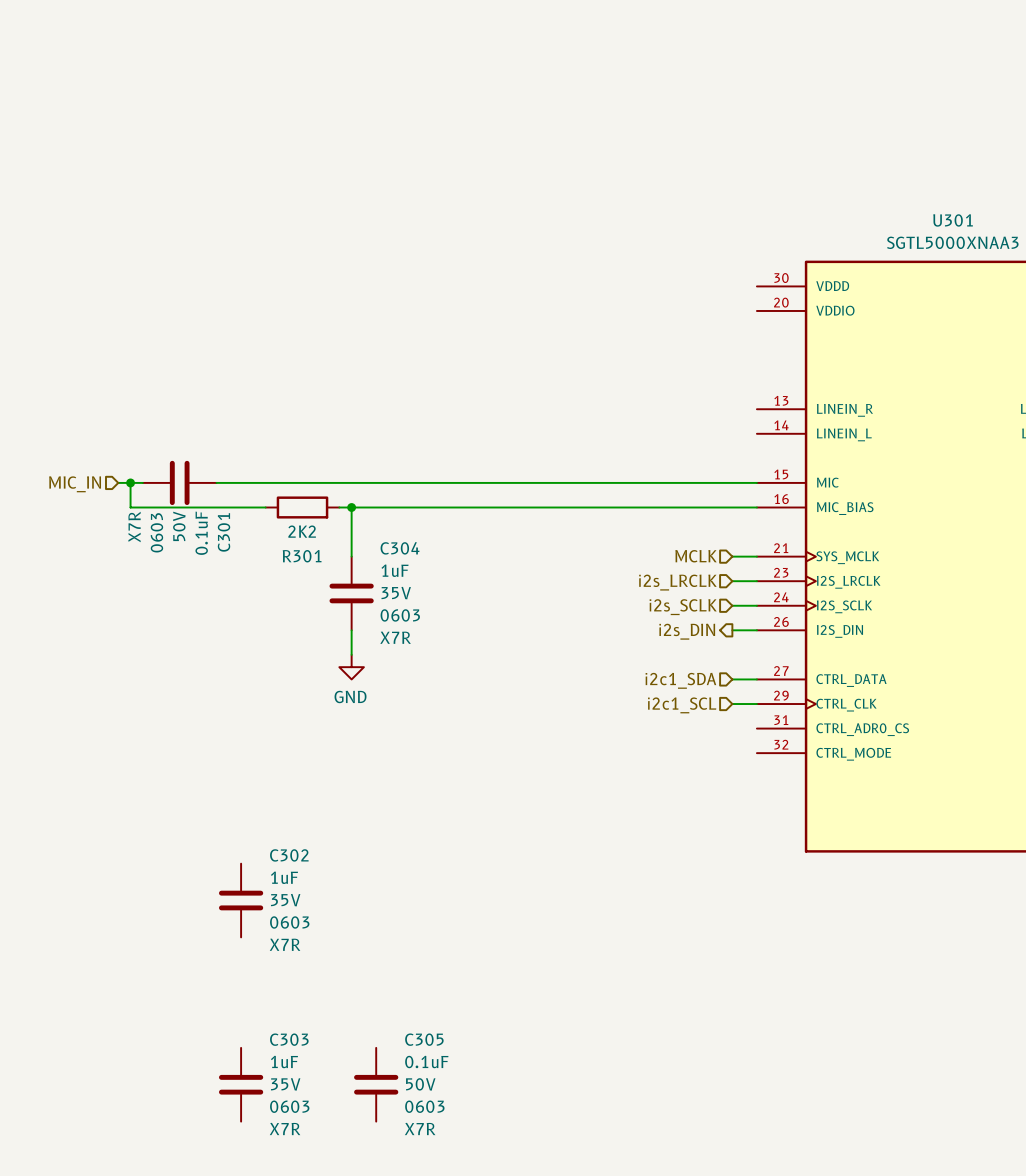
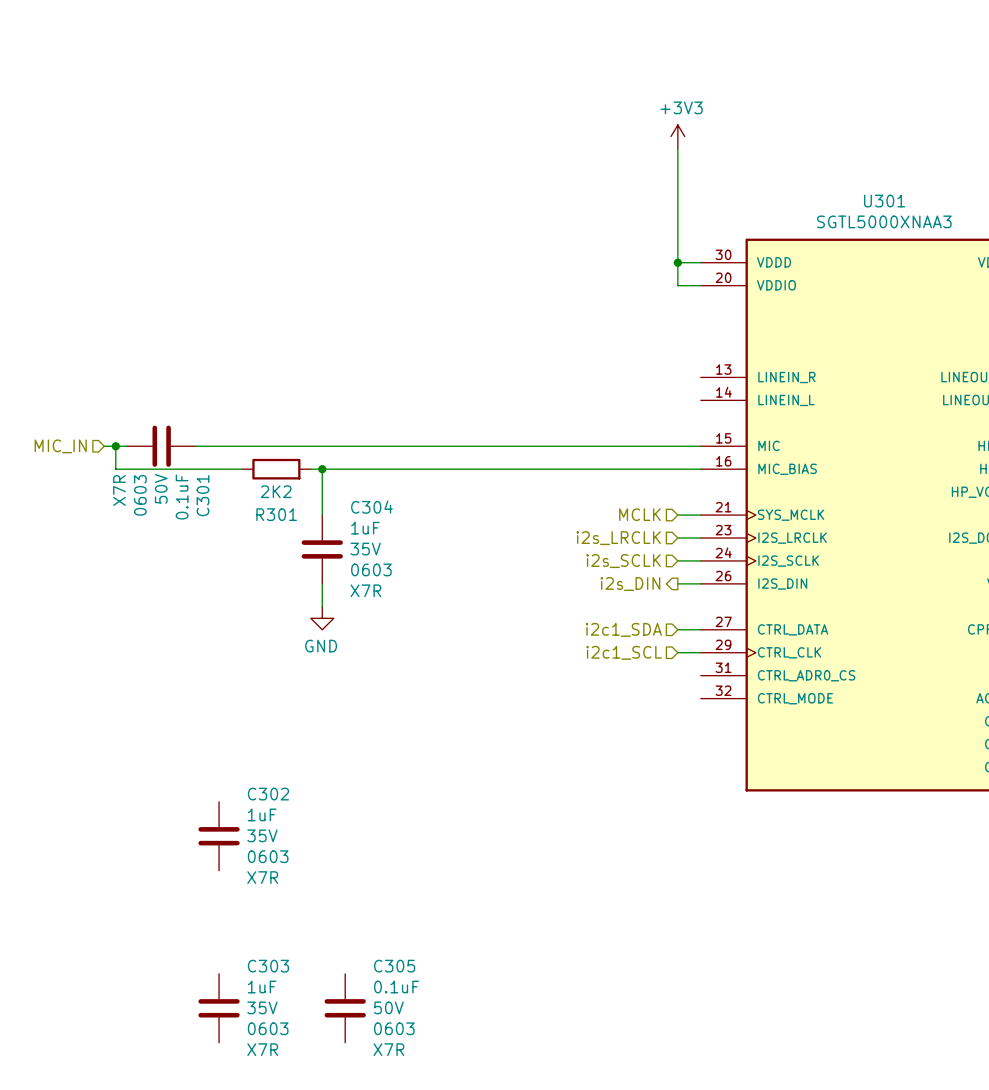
power symbol: none -> +3V3 (677, 136)
wire: none -> (677, 148) (677, 285) (700, 285)
wire: none -> (677, 262) (700, 262)
junction: none -> (677, 262)

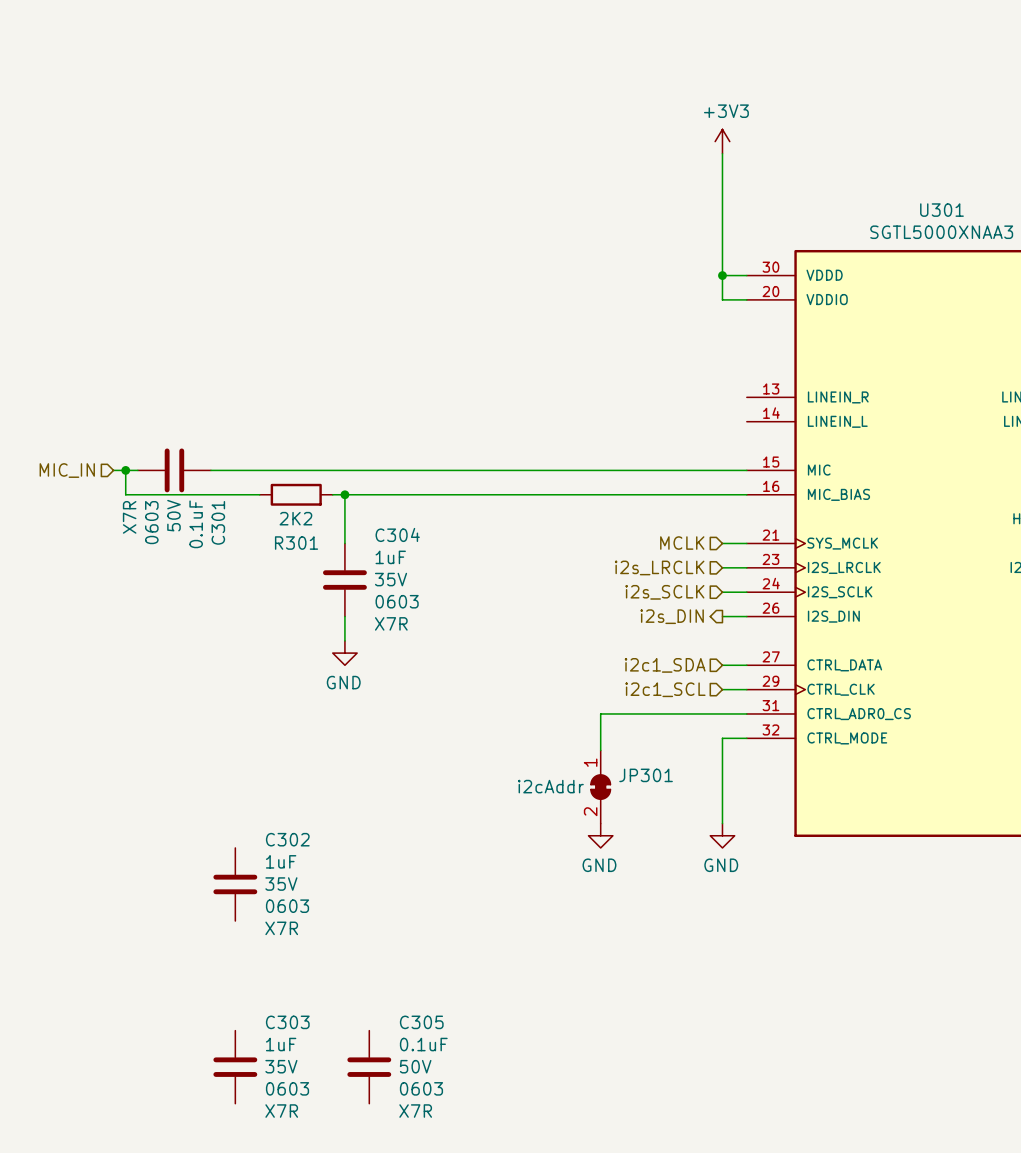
wire: none -> (746, 713) (600, 713) (600, 750)
wire: none -> (746, 738) (722, 738) (722, 823)
JP301: none -> i2cAddr (600, 787)
power symbol: none -> GND (600, 835)
power symbol: none -> GND (722, 835)

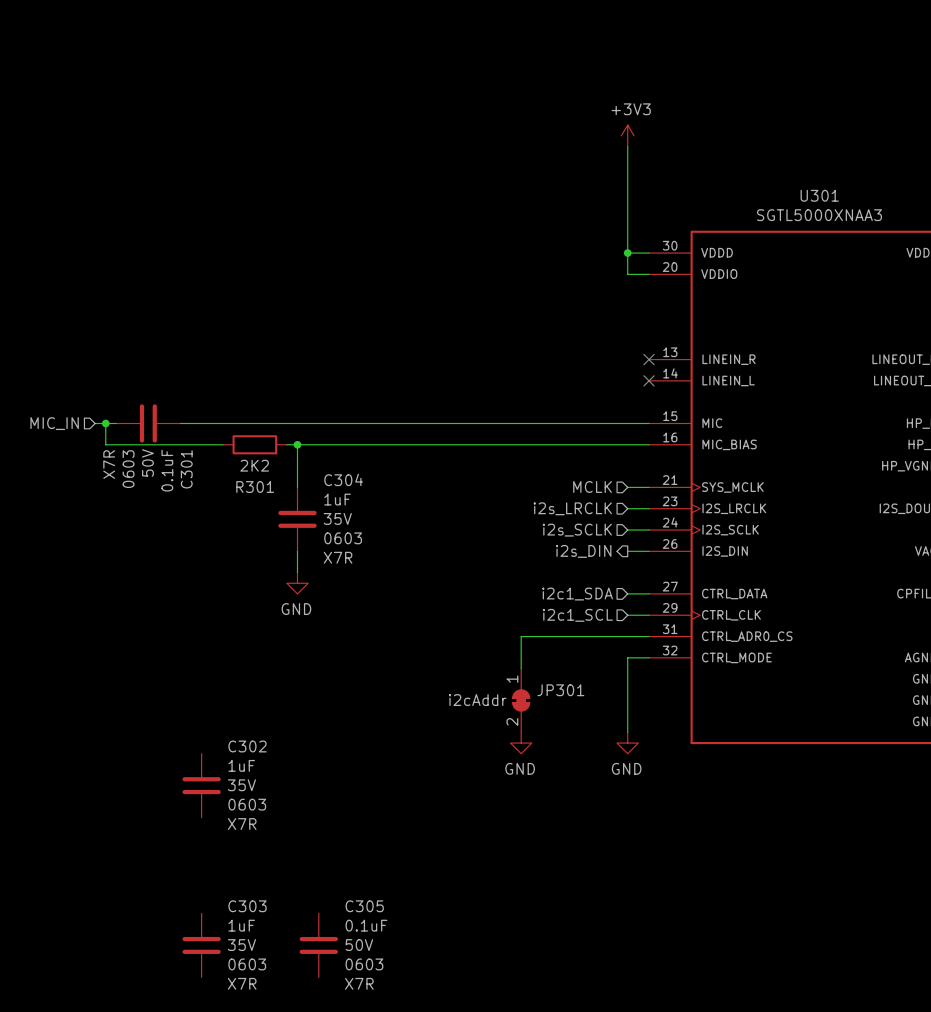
no-connect mark: none -> (649, 359)
no-connect mark: none -> (649, 380)

